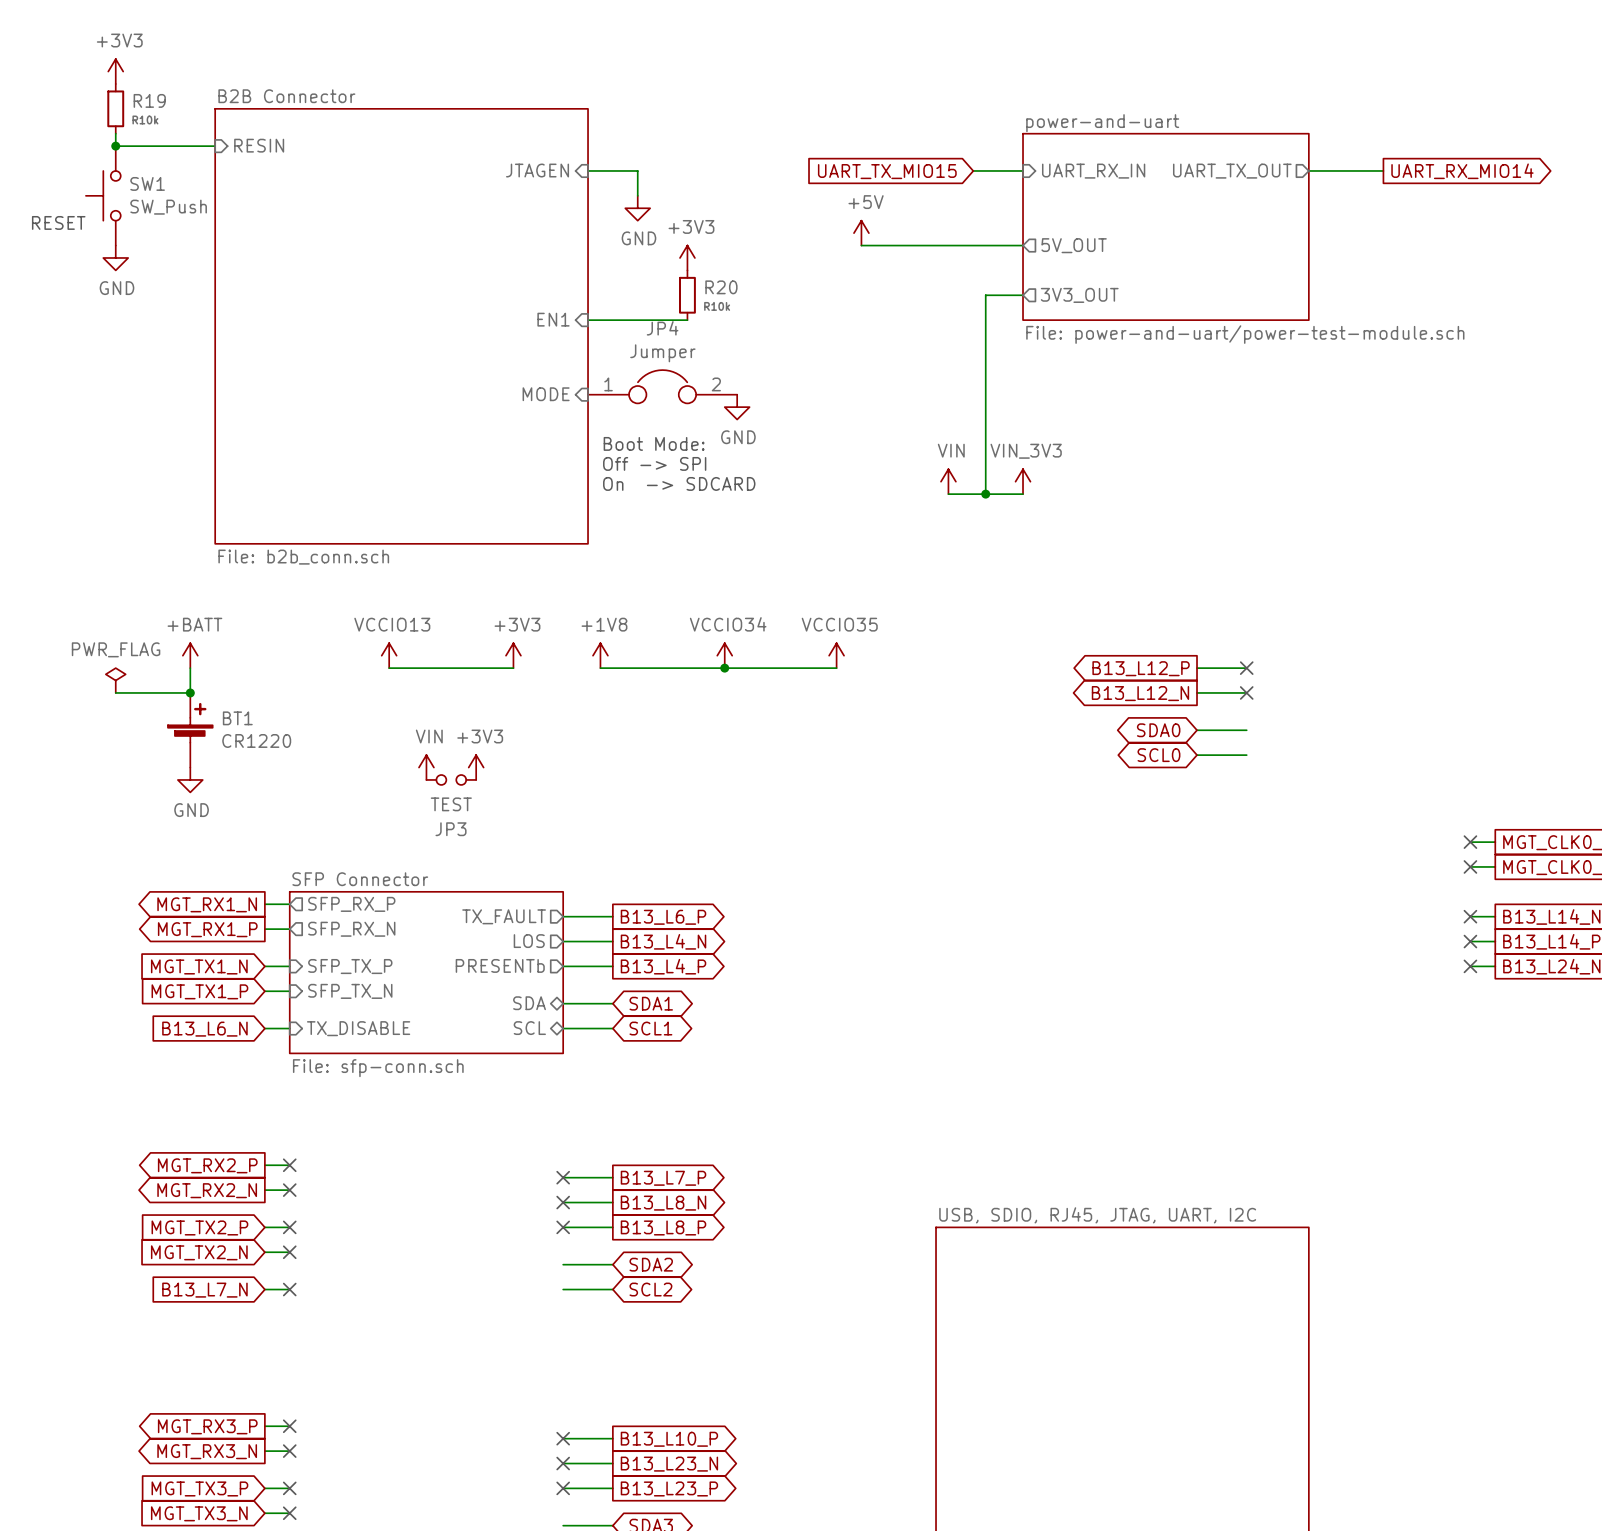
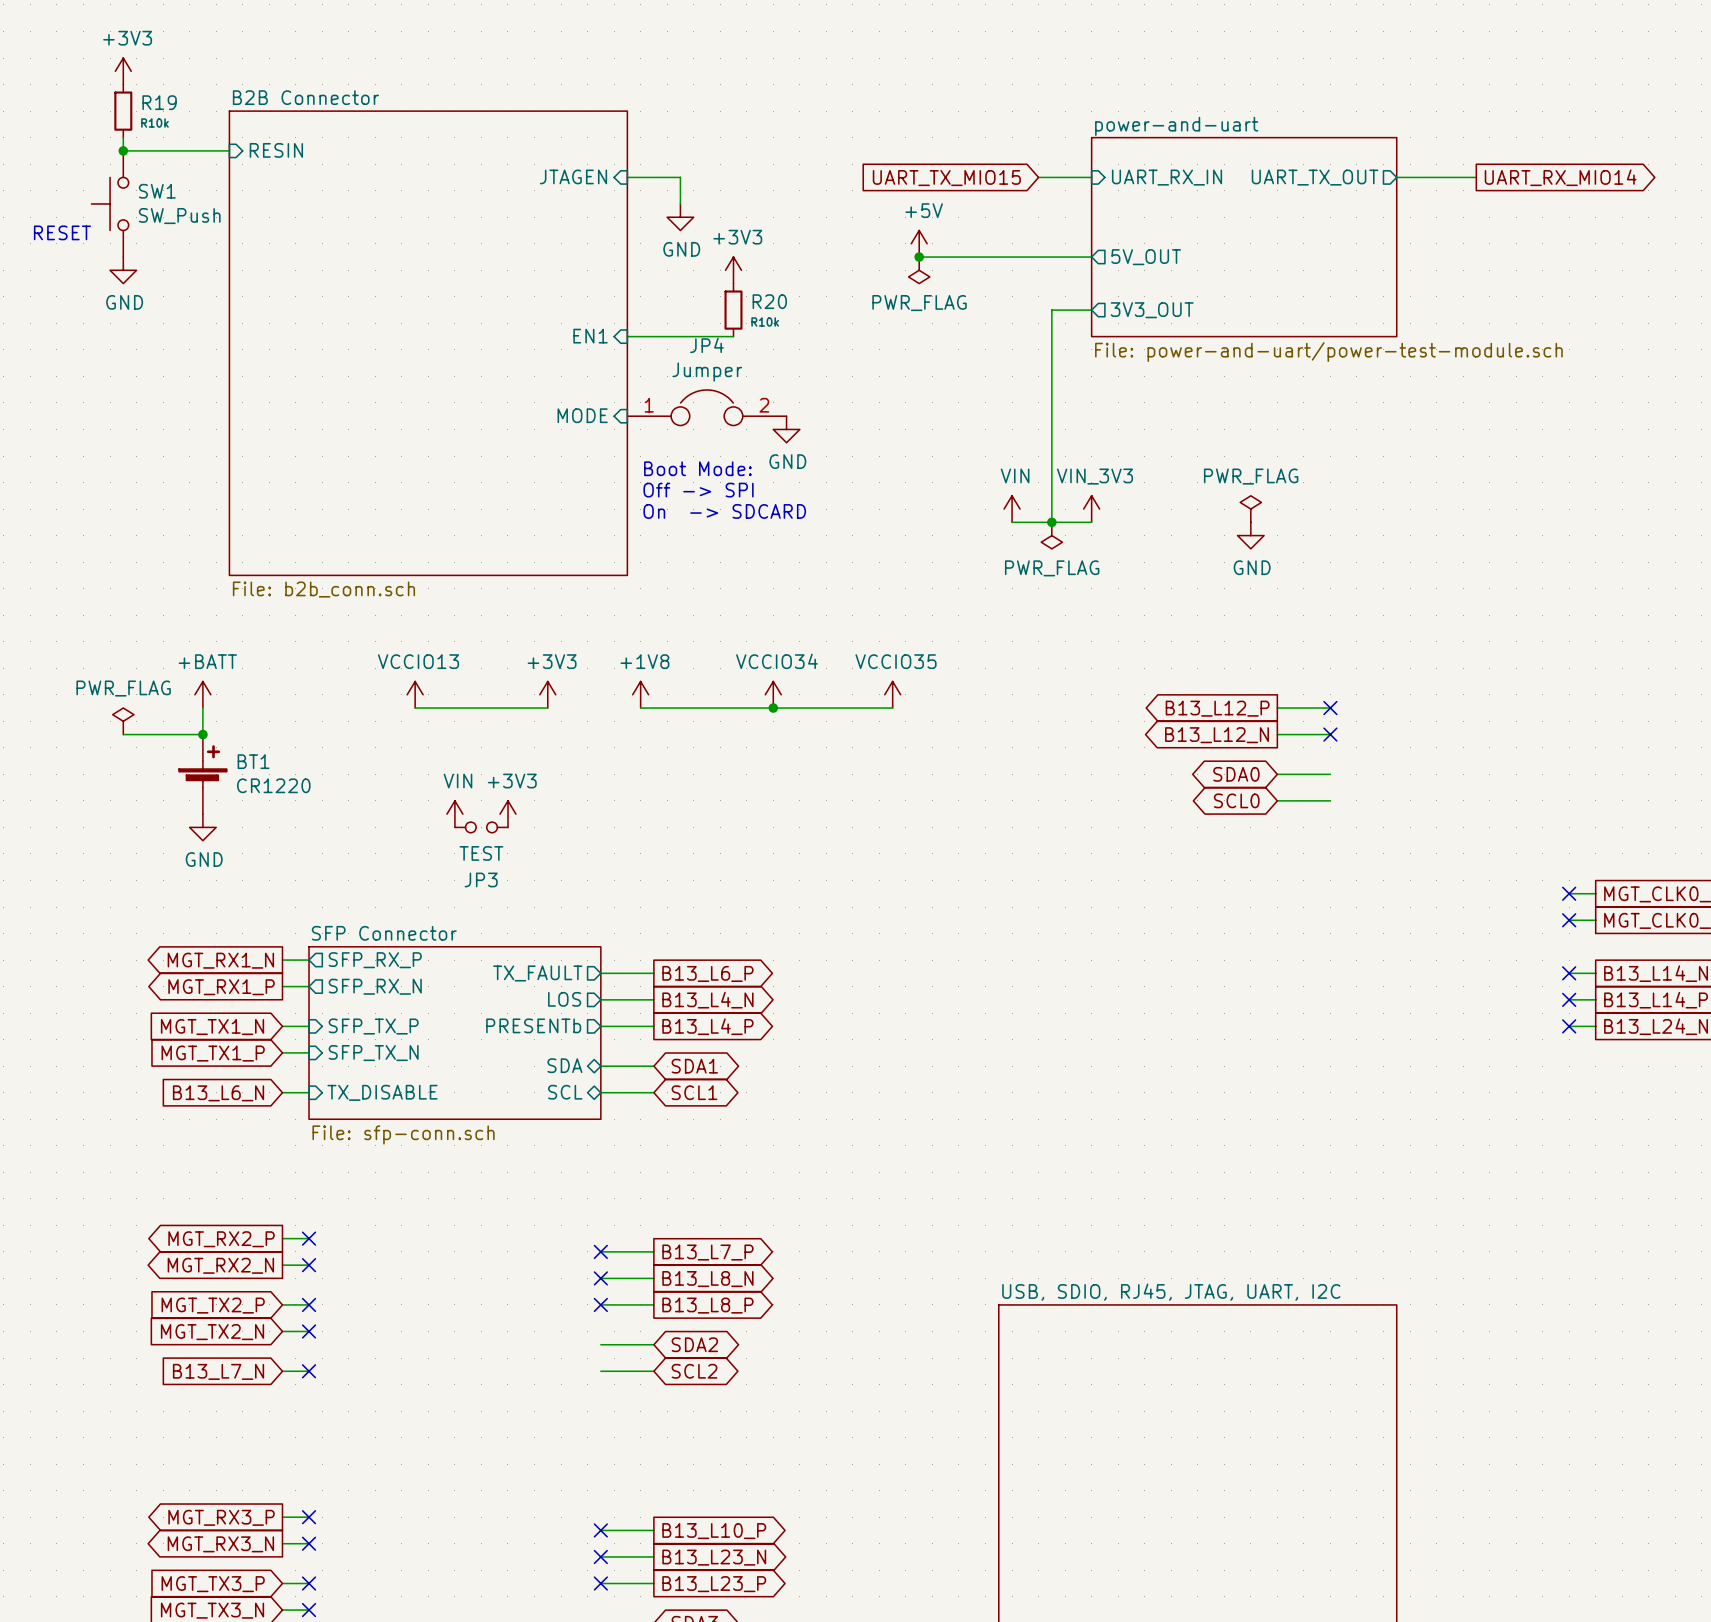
junction: none -> (919, 257)
power symbol: none -> PWR_FLAG (919, 270)
power symbol: none -> PWR_FLAG (1250, 509)
power symbol: none -> PWR_FLAG (1051, 535)
power symbol: none -> GND (1250, 535)

